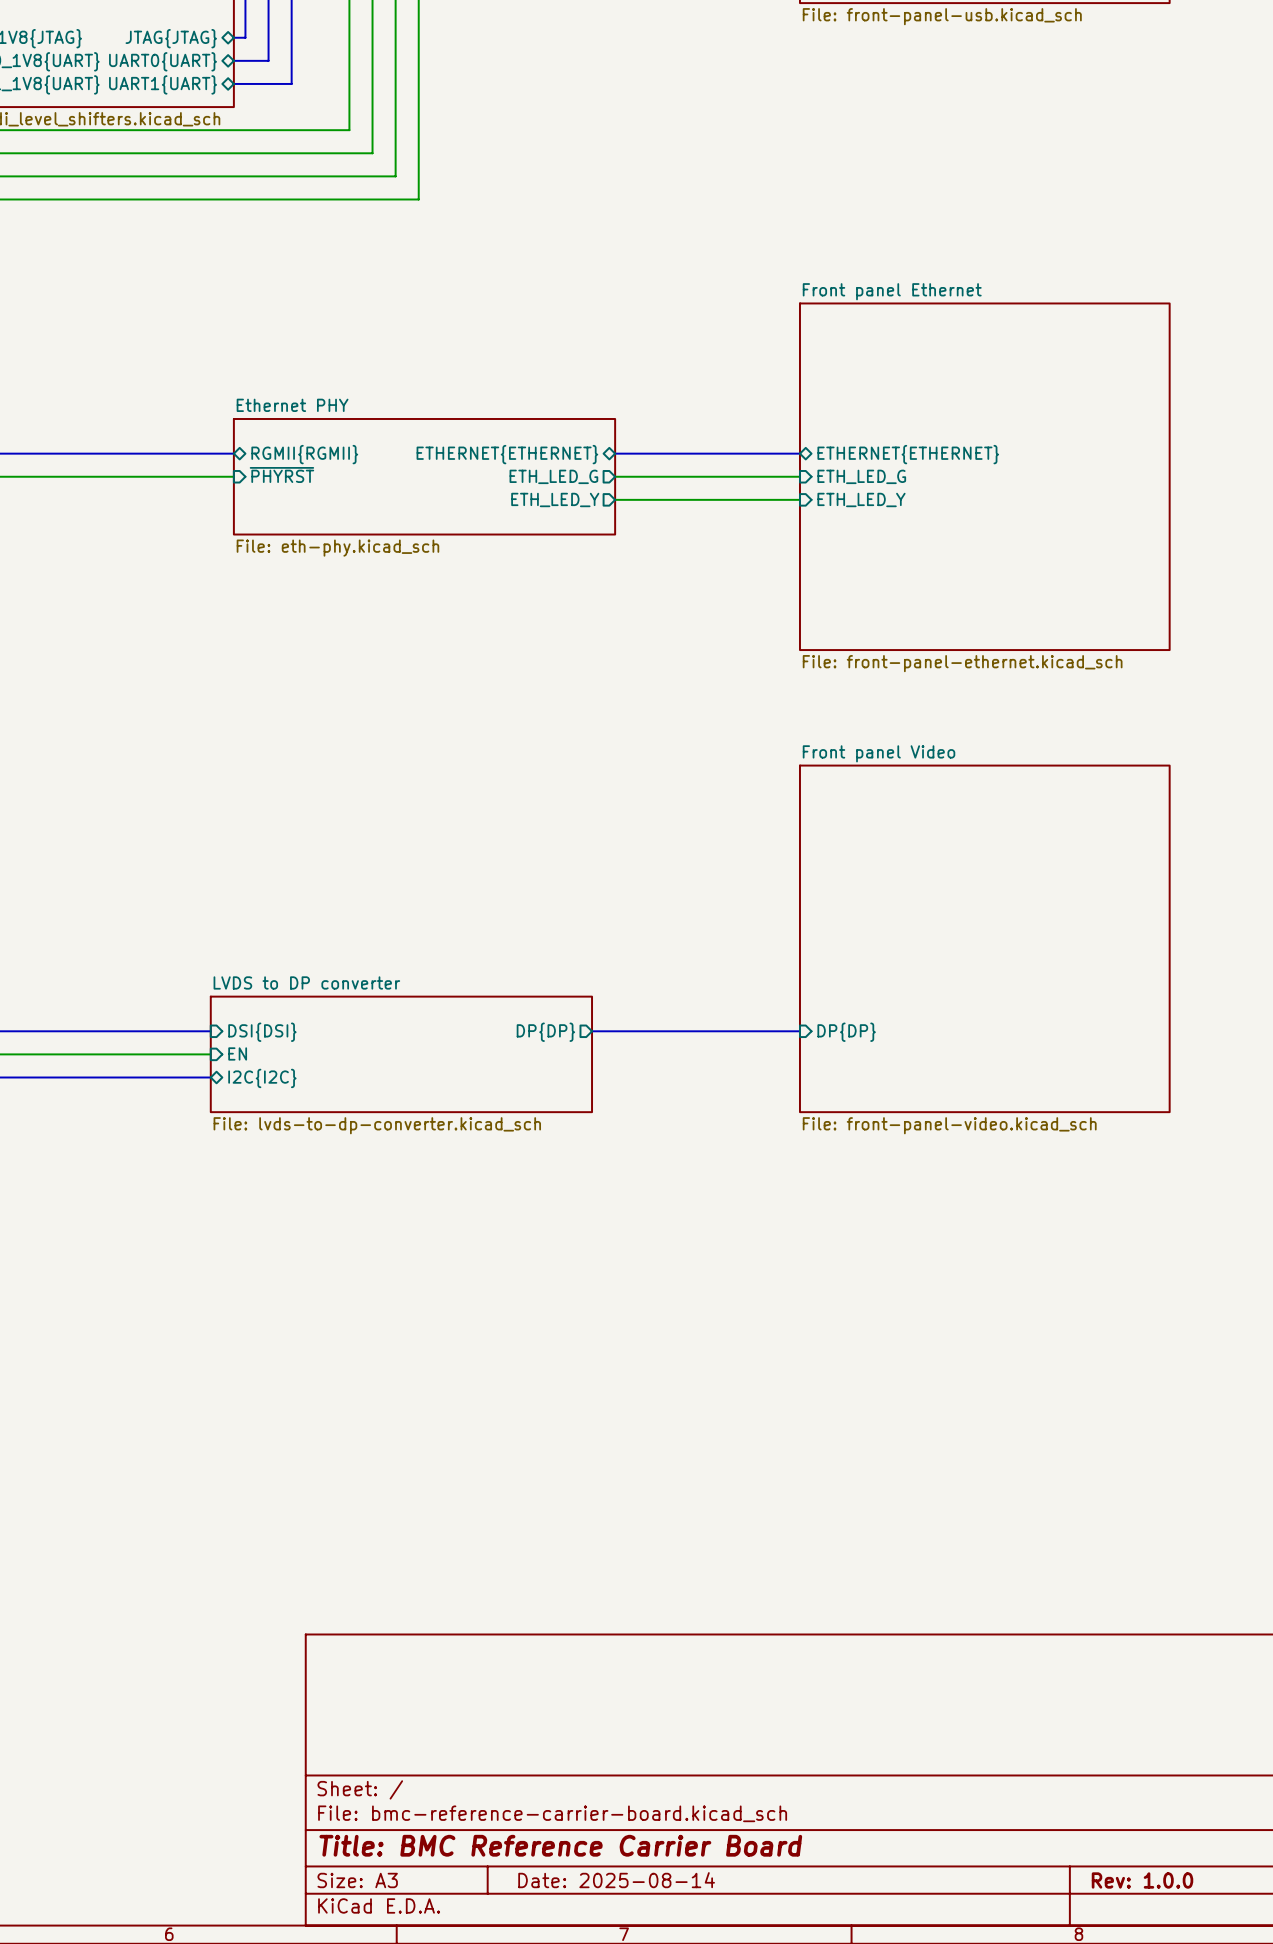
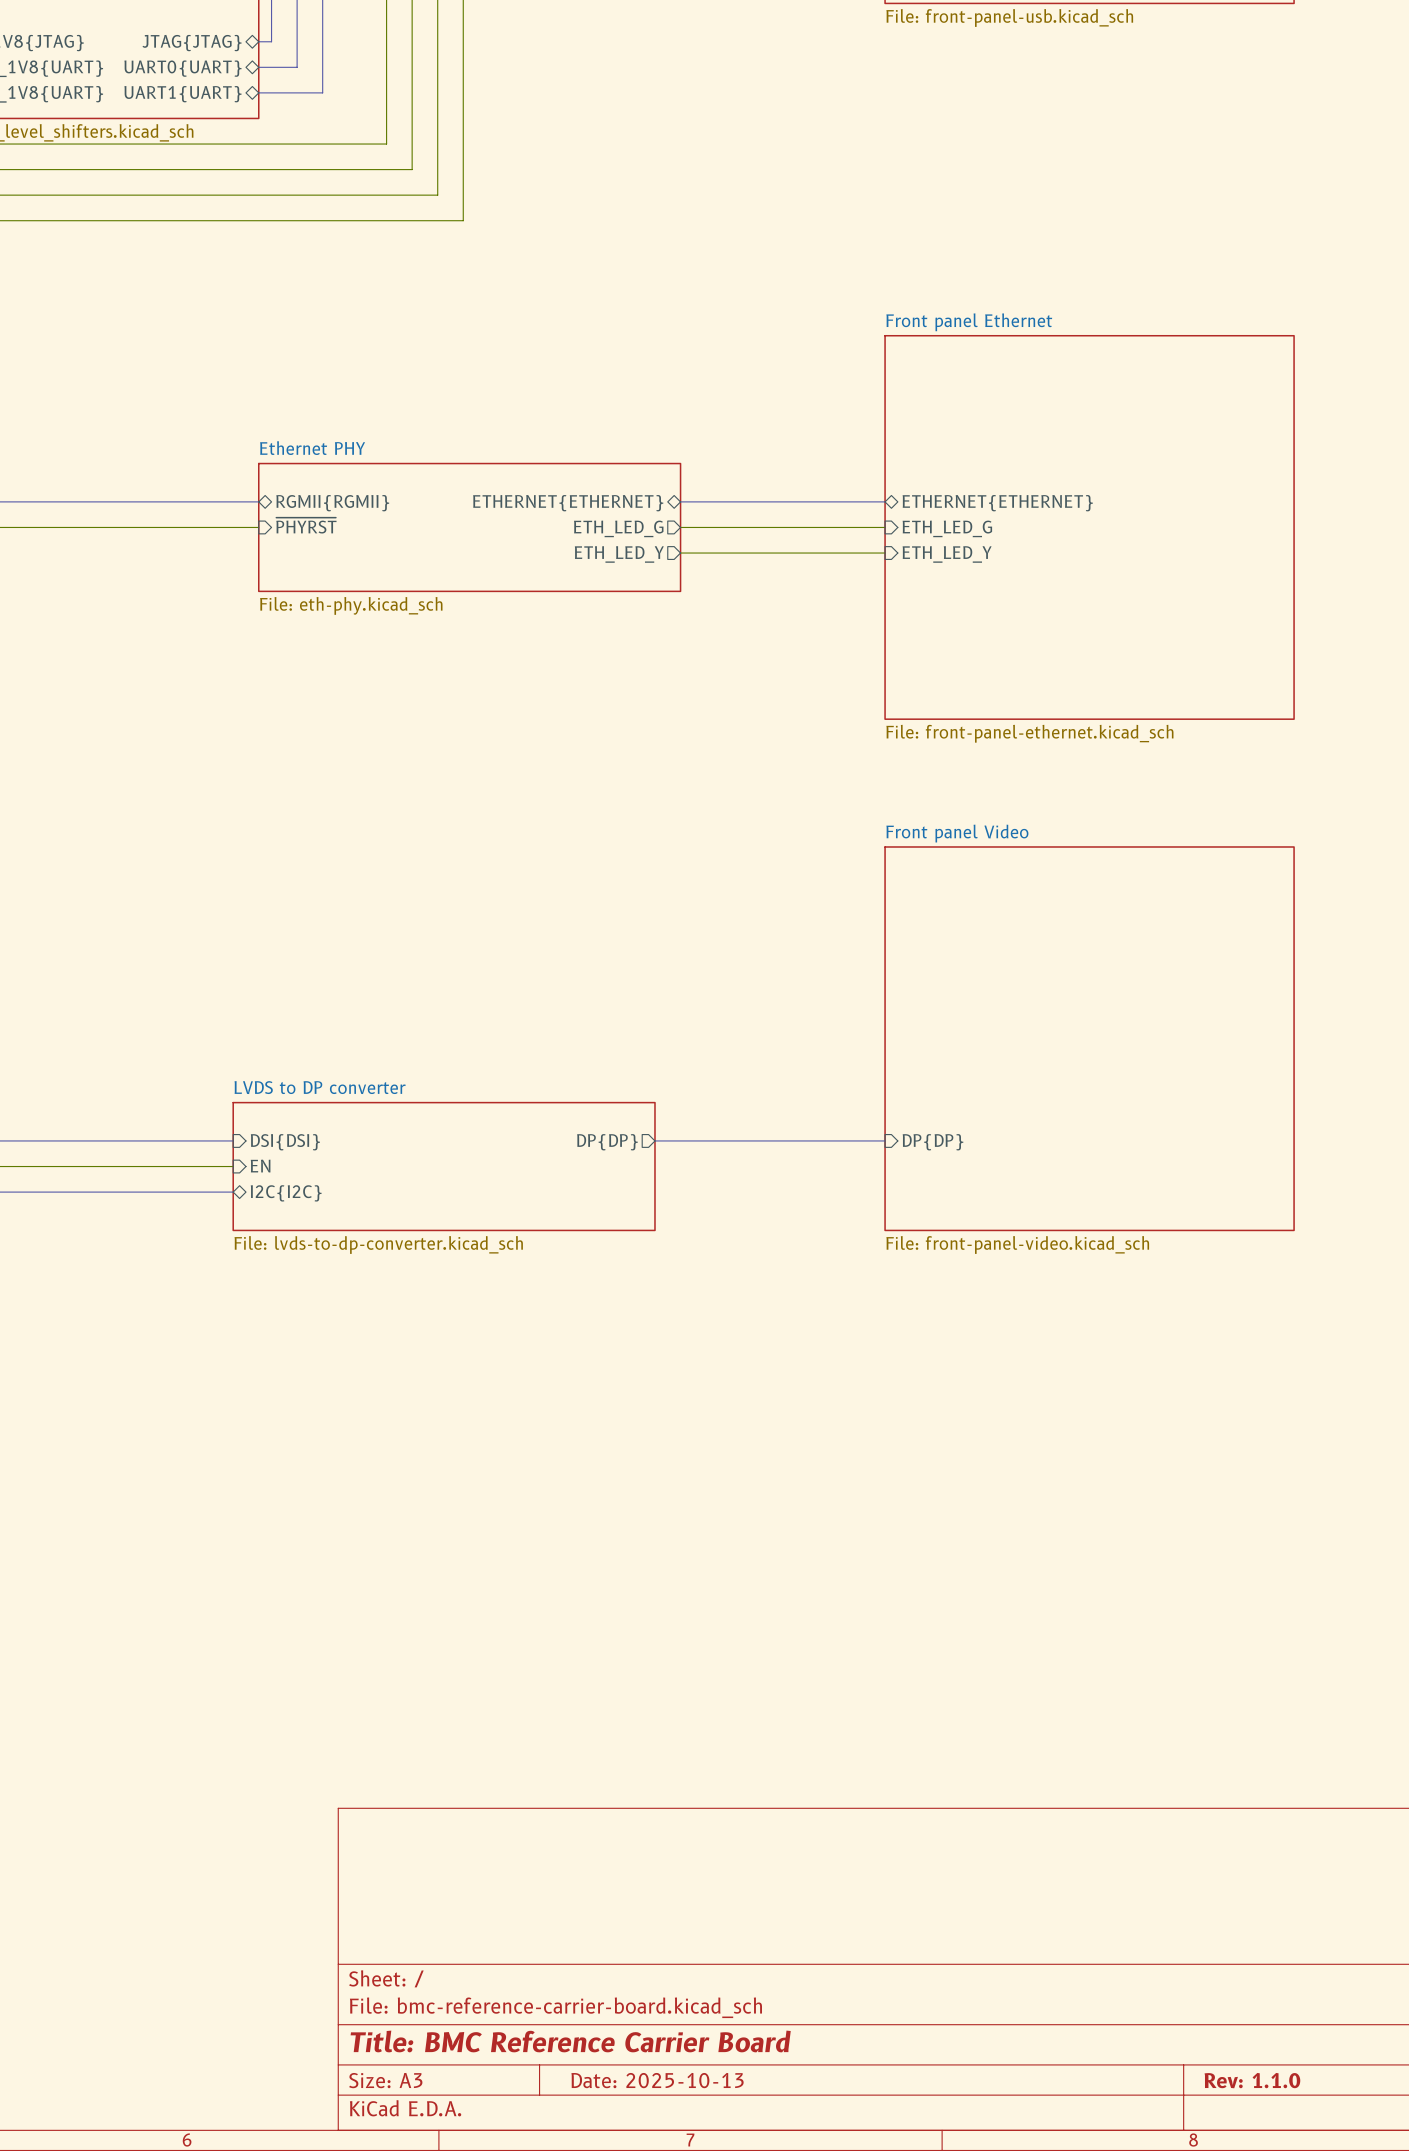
title block: Date: 2025-08-14 (616, 1880) -> Date: 2025-10-13 (657, 2080)
title block: Rev: 1.0.0 (1142, 1880) -> Rev: 1.1.0 (1252, 2080)

